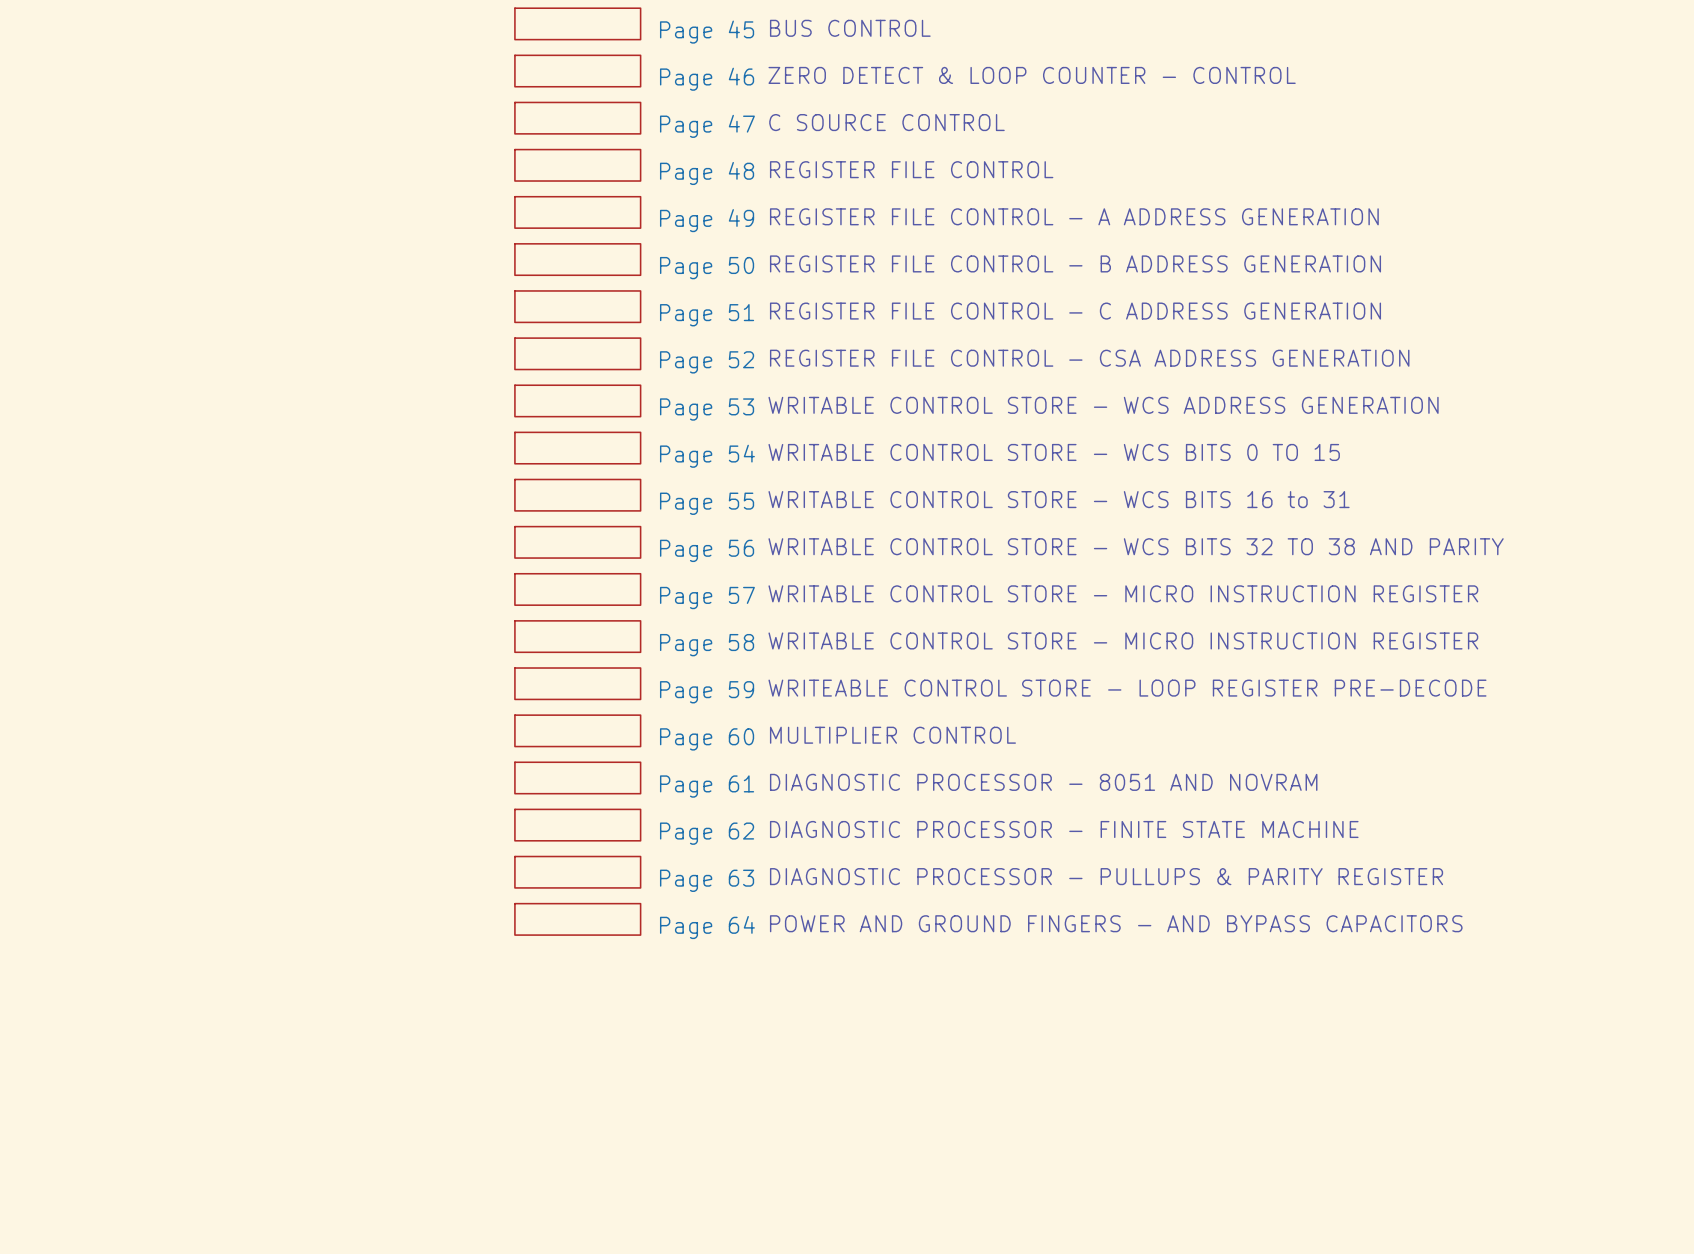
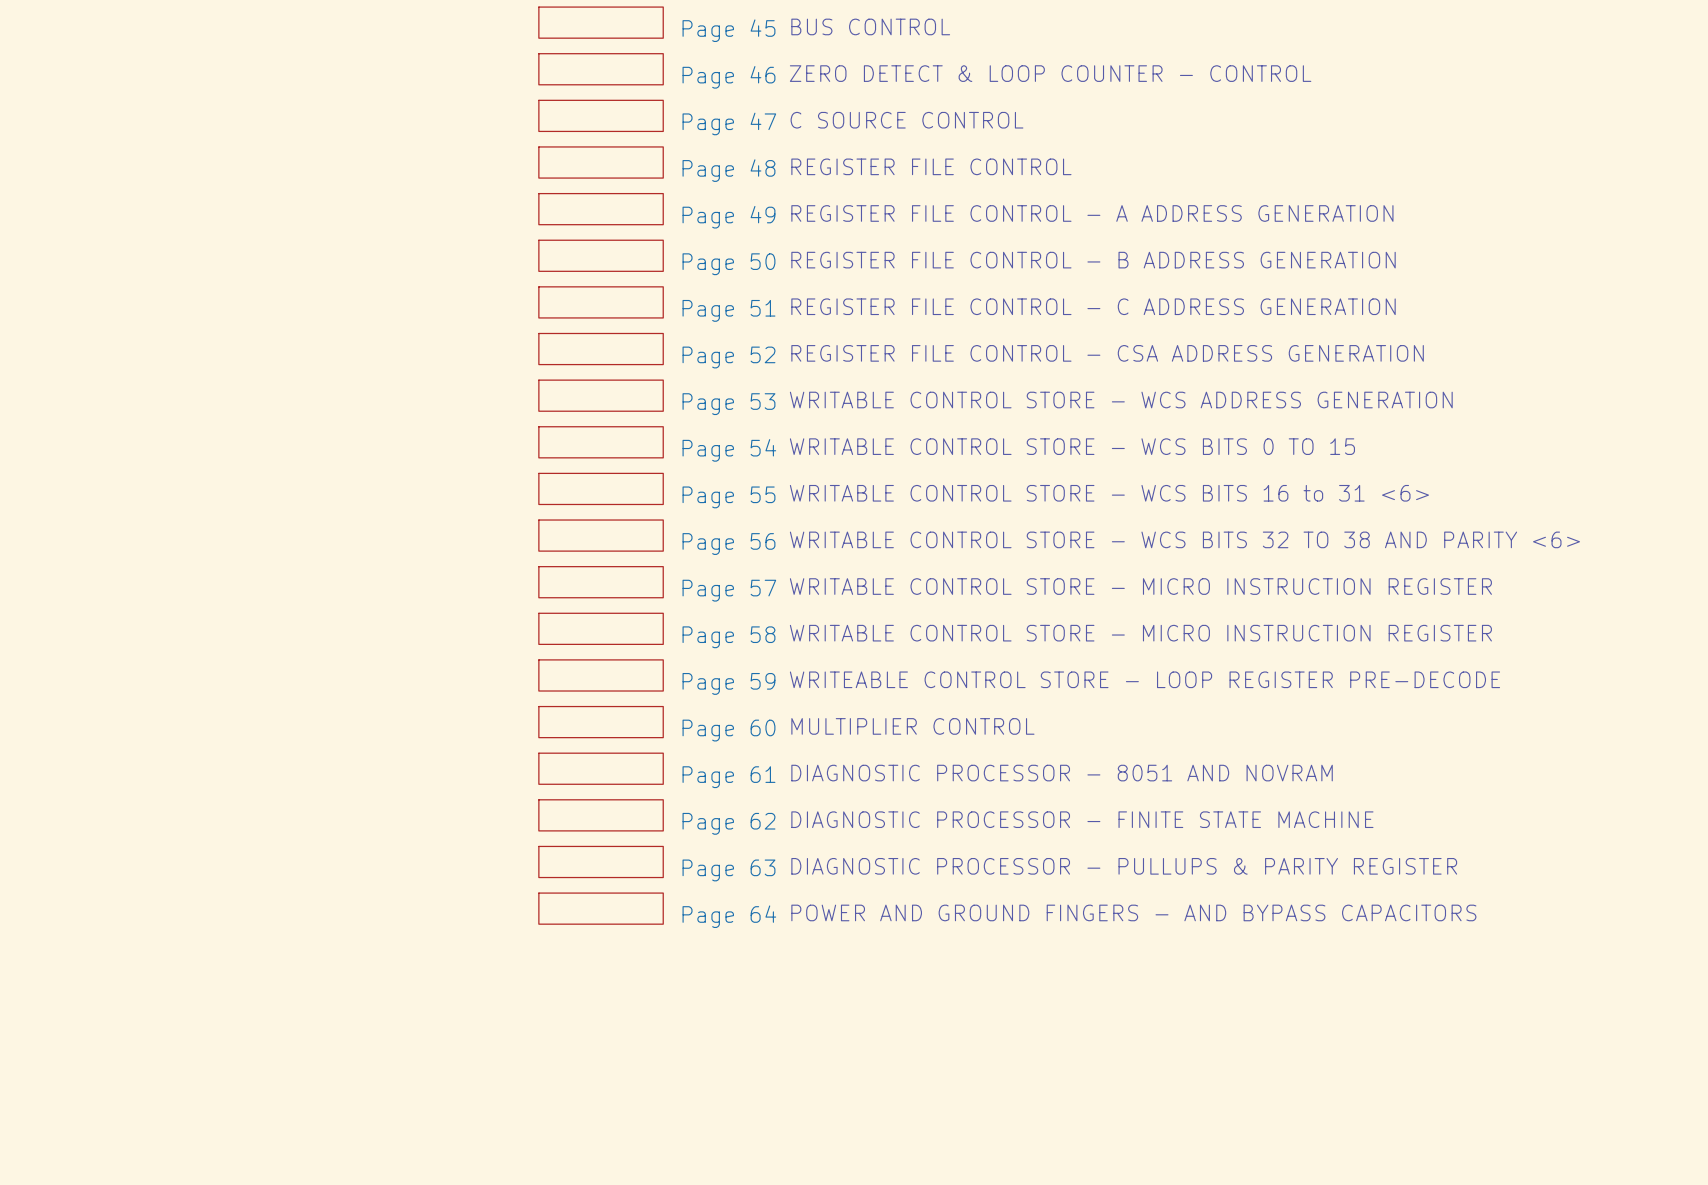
text: WRITABLE CONTROL STORE - WCS BITS 16 to 31 (1059, 499) -> WRITABLE CONTROL STORE - WCS BITS 16 to 31 <6> (1109, 493)
text: WRITABLE CONTROL STORE - WCS BITS 32 TO 38 AND PARITY (1136, 546) -> WRITABLE CONTROL STORE - WCS BITS 32 TO 38 AND PARITY <6> (1184, 539)

